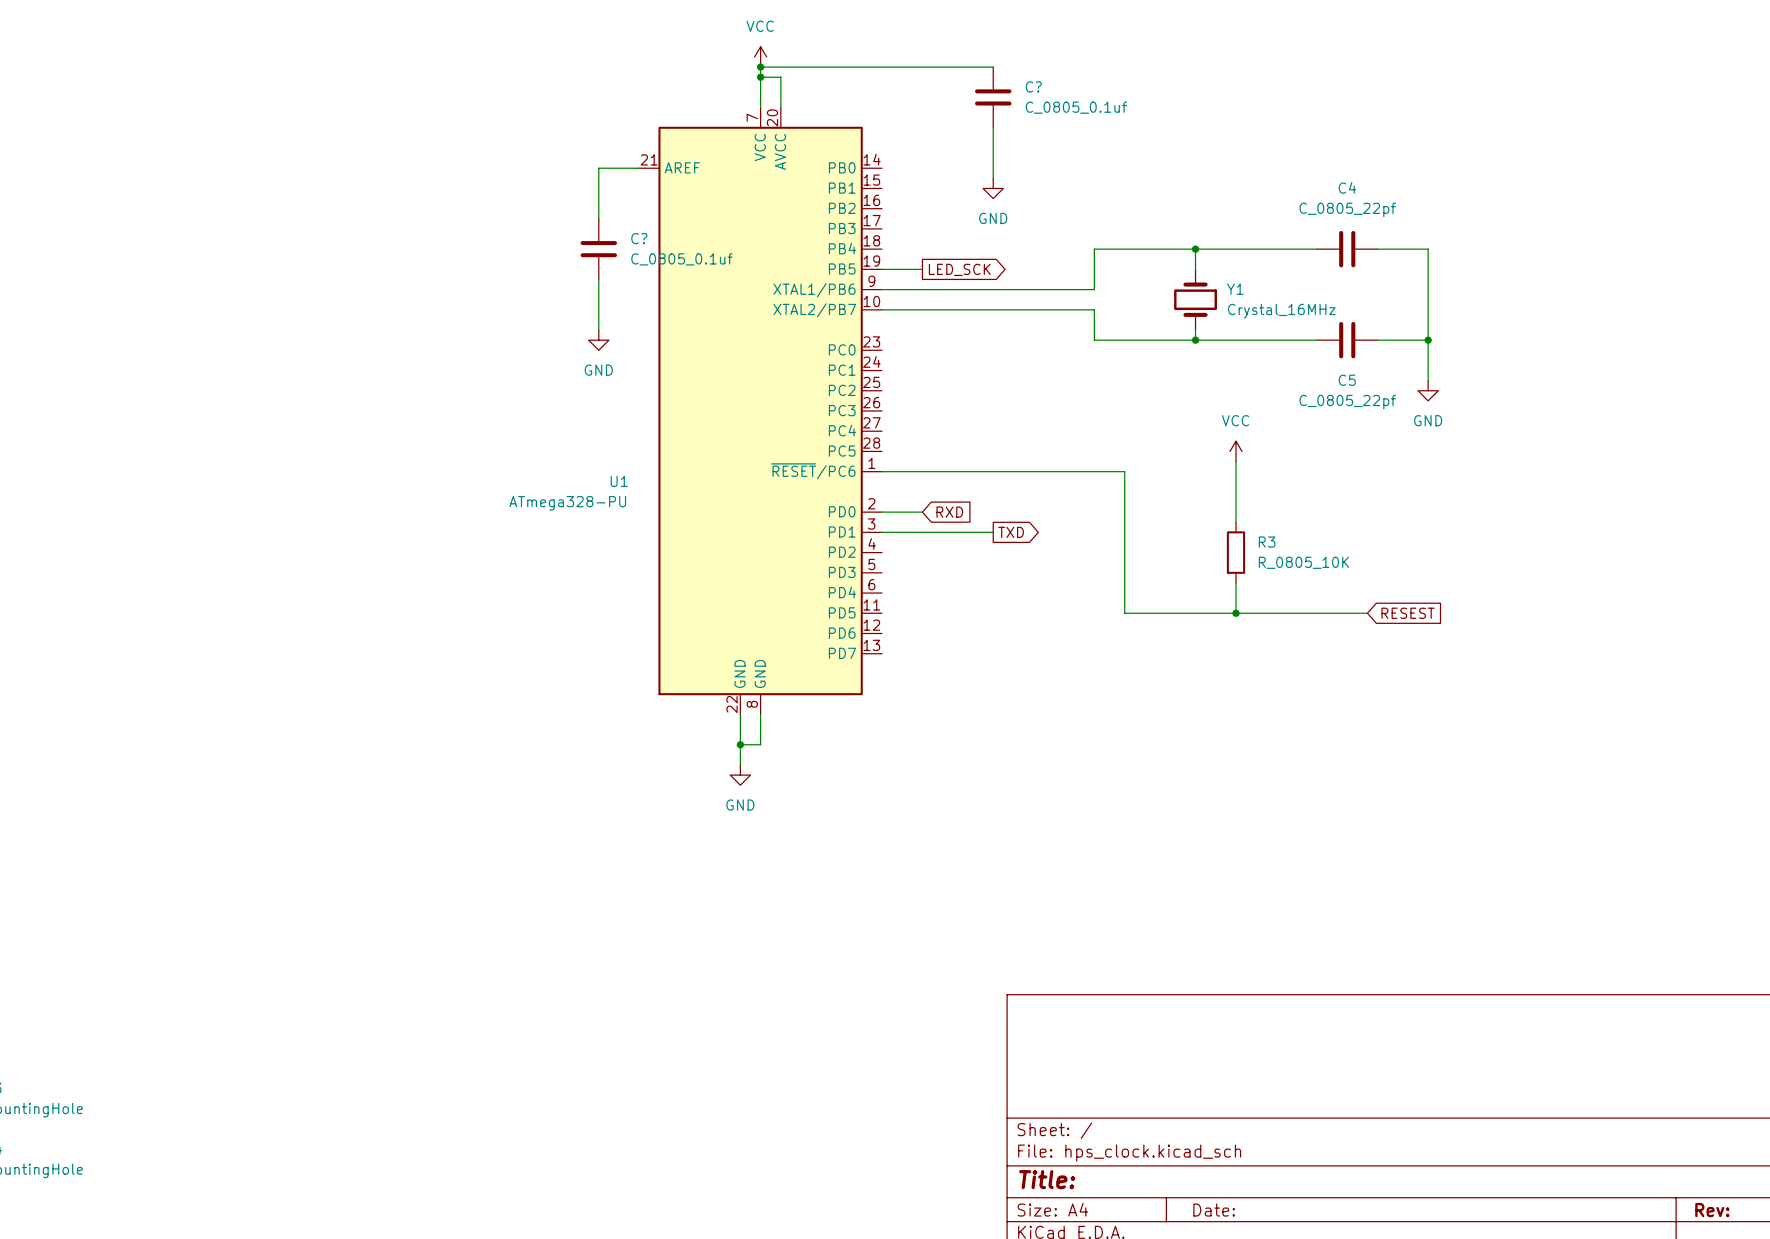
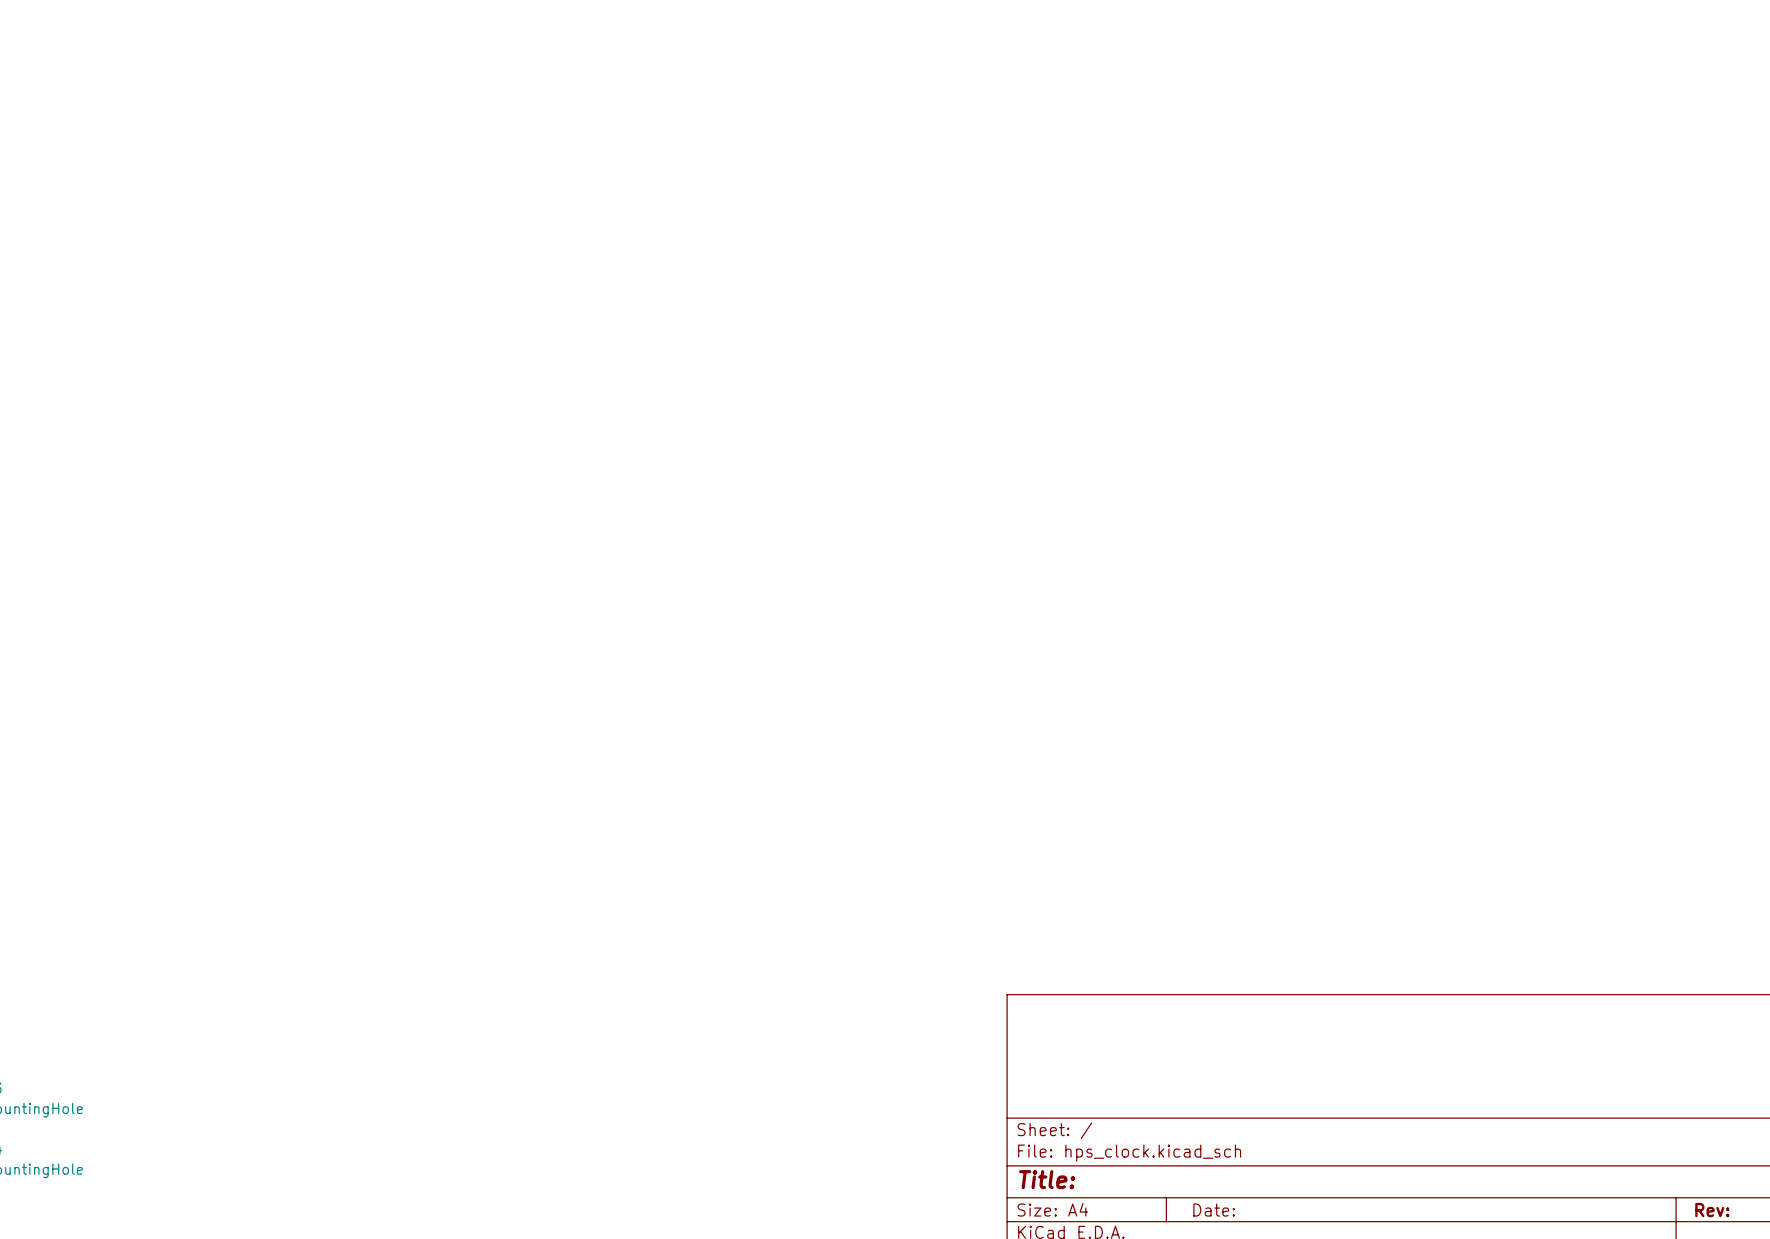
power symbol: VCC (760, 56) -> none
junction: (760, 67) -> none
wire: (993, 67) (760, 67) (760, 107) -> none
wire: (760, 77) (780, 77) (780, 107) -> none
junction: (760, 77) -> none
C?: C_0805_0.1uf (993, 97) -> none
wire: (993, 127) (993, 178) -> none
wire: (639, 168) (598, 168) (598, 218) -> none
power symbol: GND (993, 188) -> none
C?: C_0805_0.1uf (598, 249) -> none
wire: (1195, 249) (1195, 269) -> none
junction: (1195, 249) -> none
wire: (1316, 249) (1094, 249) (1094, 289) (881, 289) -> none
C4: C_0805_22pf (1347, 249) -> none
wire: (1377, 249) (1428, 249) (1428, 380) -> none
wire: (881, 269) (922, 269) -> none
global label: LED_SCK (959, 269) -> none
wire: (598, 279) (598, 330) -> none
Y1: Crystal_16MHz (1195, 299) -> none
wire: (881, 309) (1094, 309) (1094, 340) (1316, 340) -> none
wire: (1195, 330) (1195, 340) -> none
power symbol: GND (598, 340) -> none
junction: (1195, 340) -> none
C5: C_0805_22pf (1347, 340) -> none
wire: (1377, 340) (1428, 340) -> none
junction: (1428, 340) -> none
power symbol: GND (1428, 390) -> none
U1: ATmega328-PU (760, 410) -> none
power symbol: VCC (1235, 451) -> none
wire: (1235, 461) (1235, 522) -> none
wire: (881, 471) (1124, 471) (1124, 613) (1367, 613) -> none
wire: (881, 512) (922, 512) -> none
global label: RXD (949, 512) -> none
wire: (881, 532) (993, 532) -> none
global label: TXD (1011, 532) -> none
R3: R_0805_10K (1235, 552) -> none
wire: (1235, 582) (1235, 613) -> none
junction: (1235, 613) -> none
global label: RESEST (1408, 613) -> none
wire: (740, 714) (740, 764) -> none
wire: (760, 714) (760, 744) (740, 744) -> none
junction: (740, 744) -> none
power symbol: GND (740, 775) -> none

